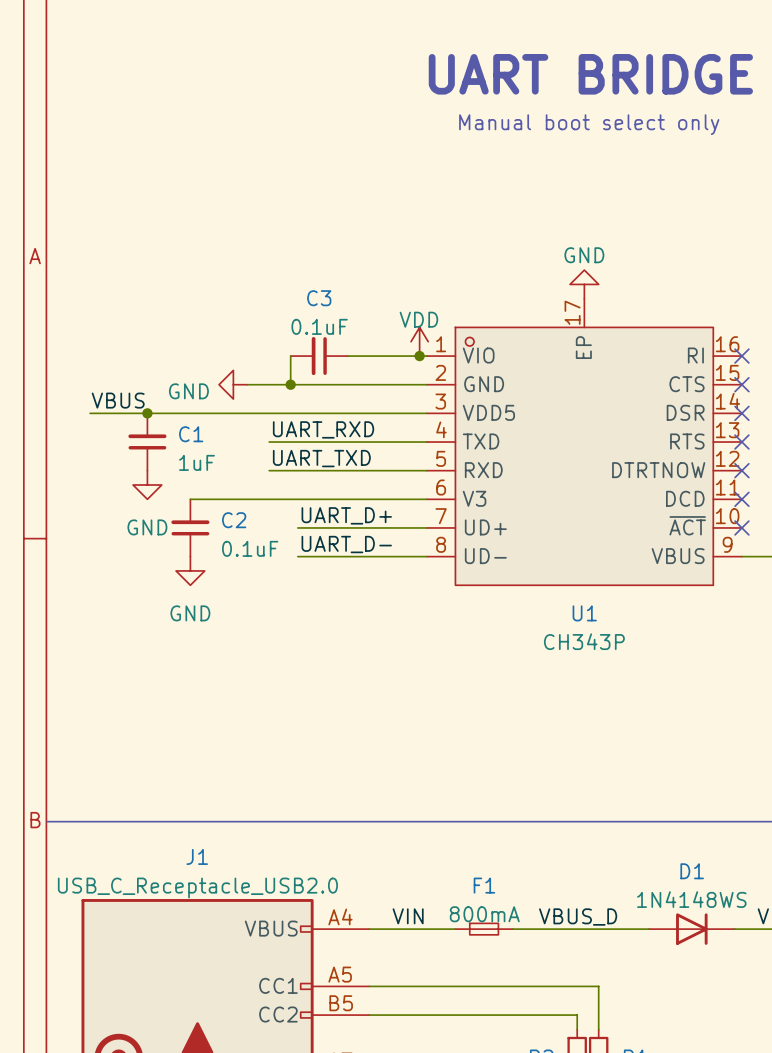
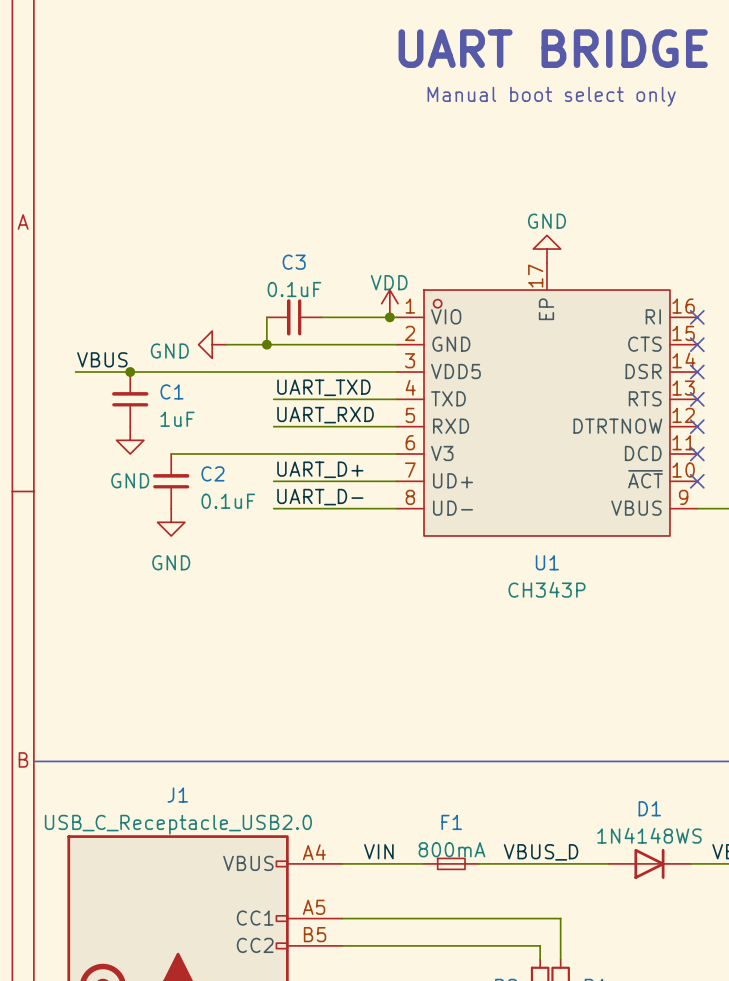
label position: UART_RXD (323, 429) -> UART_RXD (325, 415)
wire: (269, 442) (297, 442) -> none
label position: UART_TXD (321, 458) -> UART_TXD (323, 387)
wire: (269, 470) (297, 470) -> none

